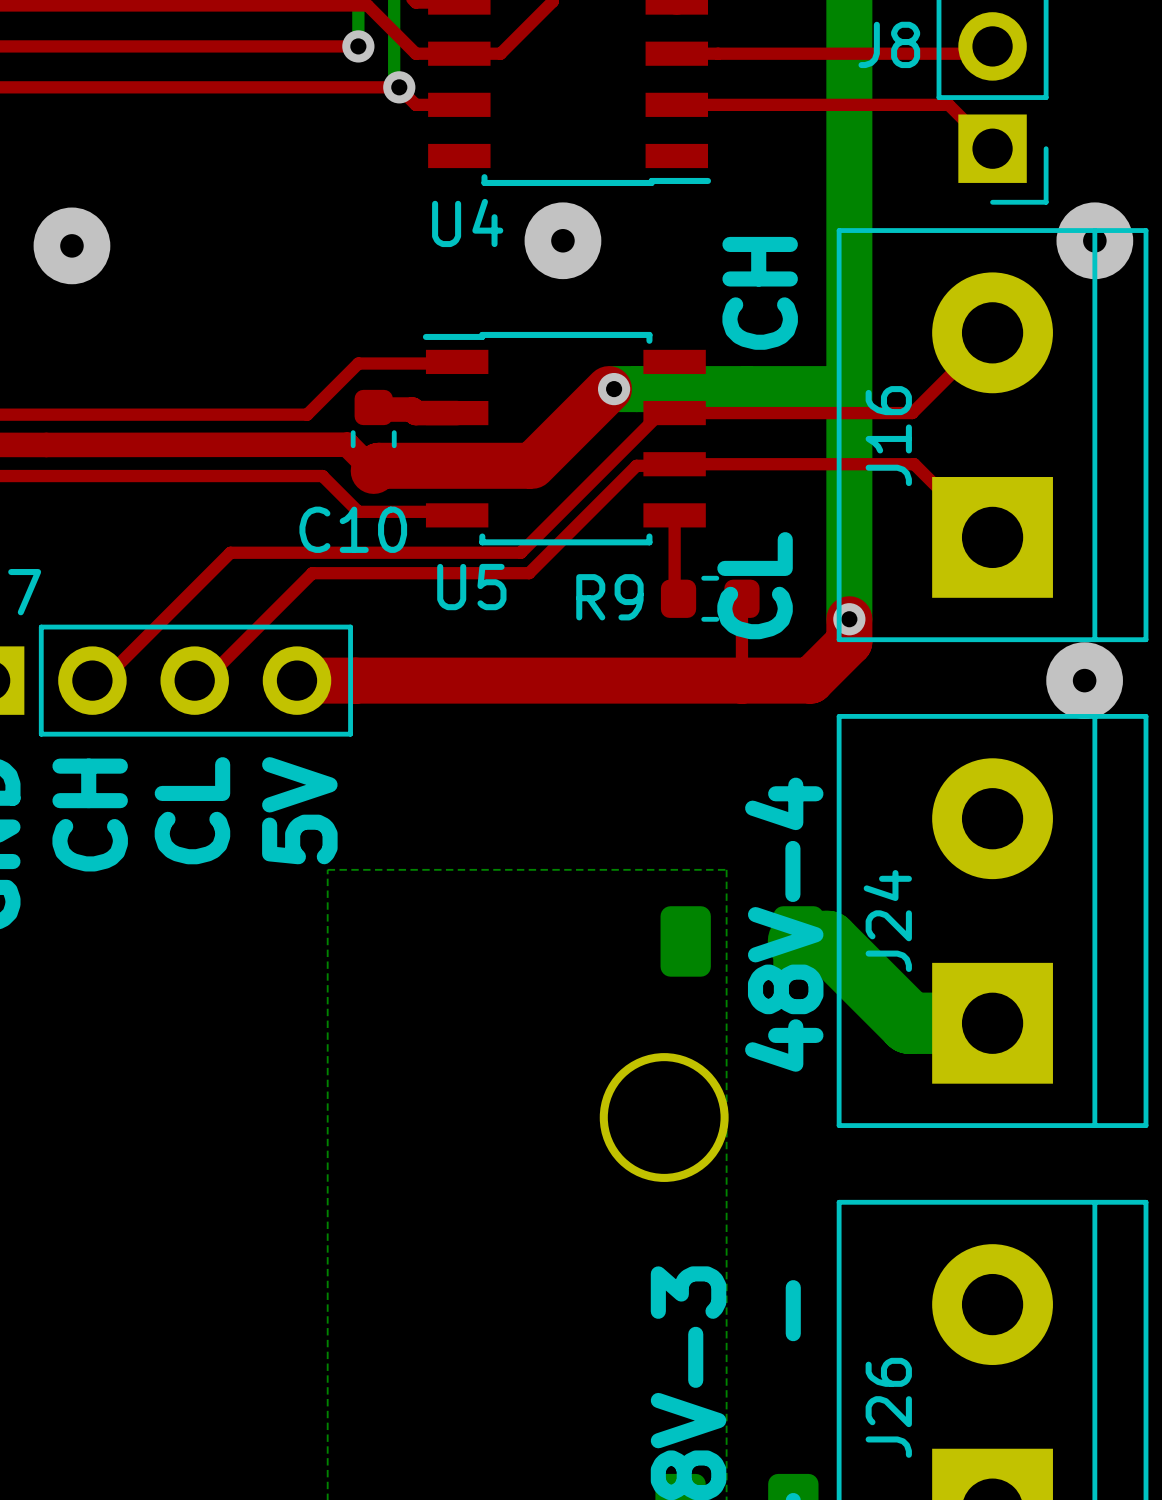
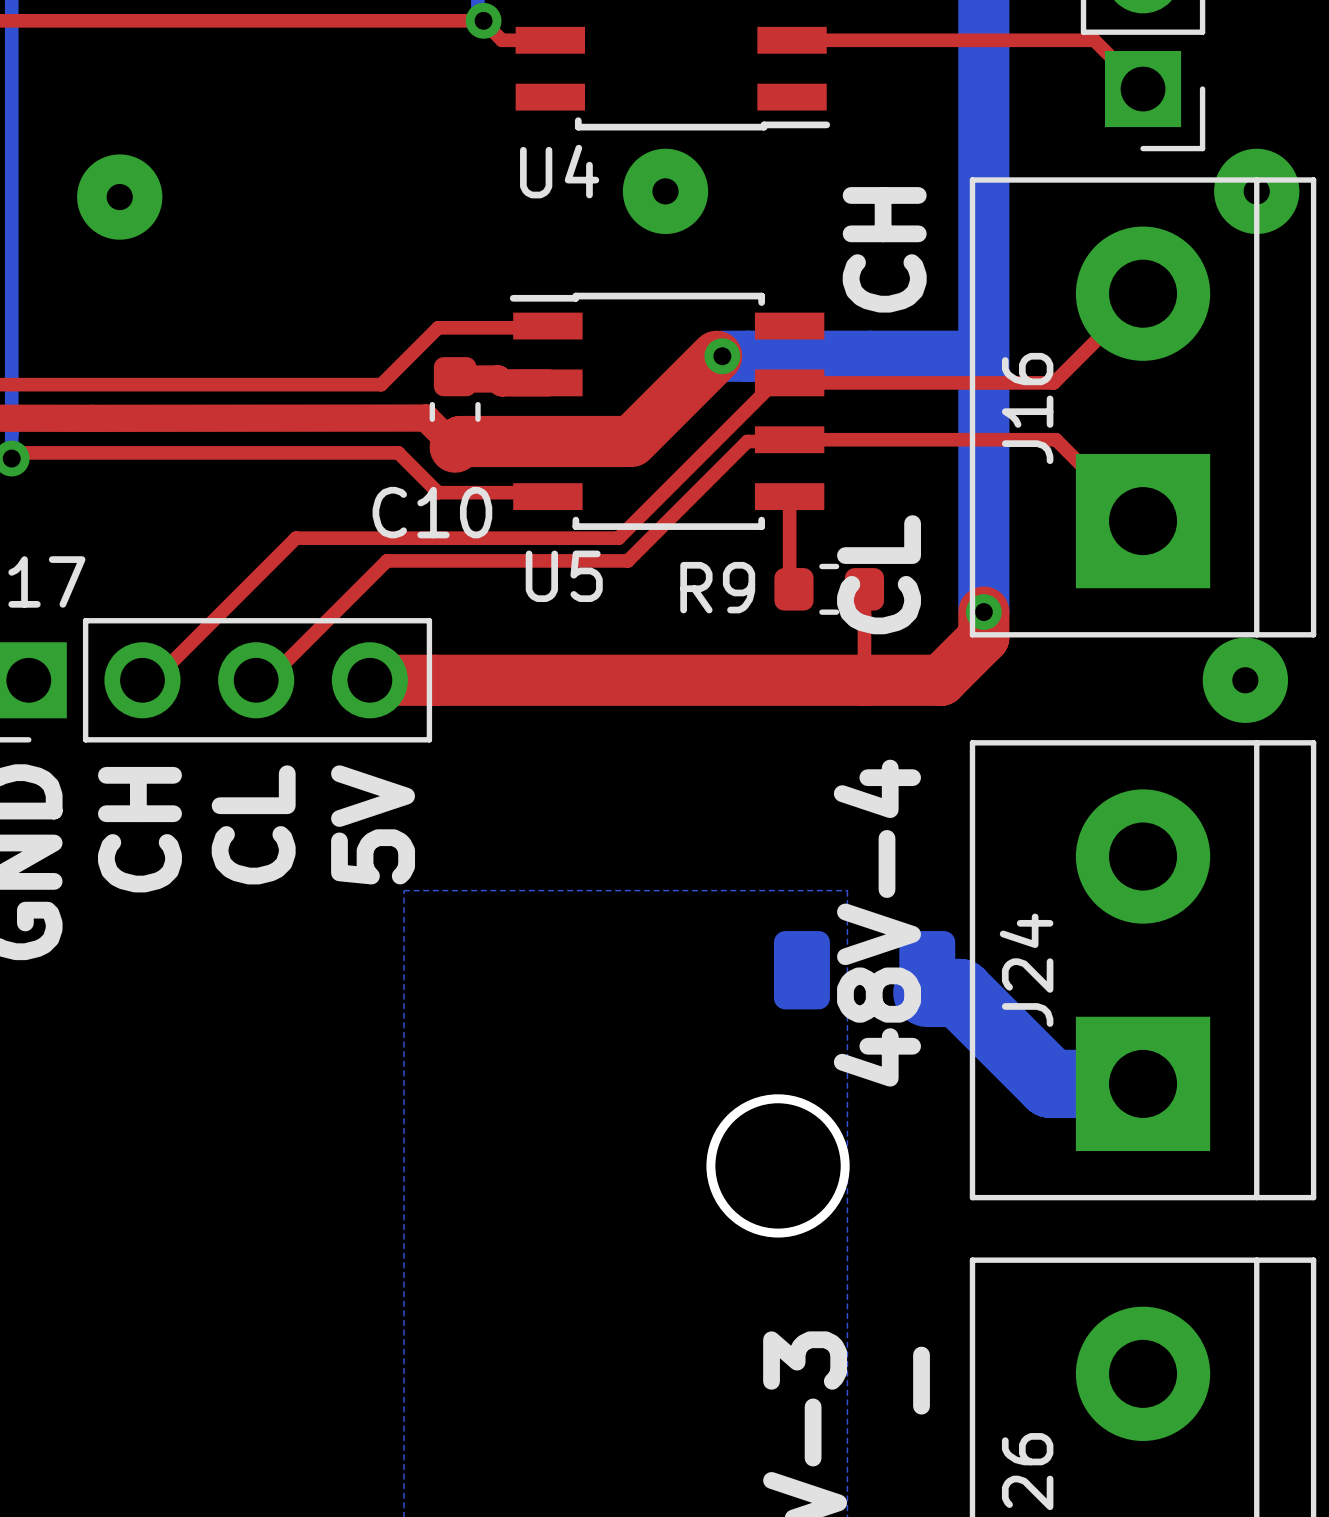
J24 position: (992, 920) -> (1143, 970)
text position: 48V-4 (784, 924) -> 48V-4 (877, 923)
bottom track: (798, 941) (827, 941) (909, 1023) (987, 1023) -> (927, 992) (959, 992) (1050, 1083) (1137, 1083)

